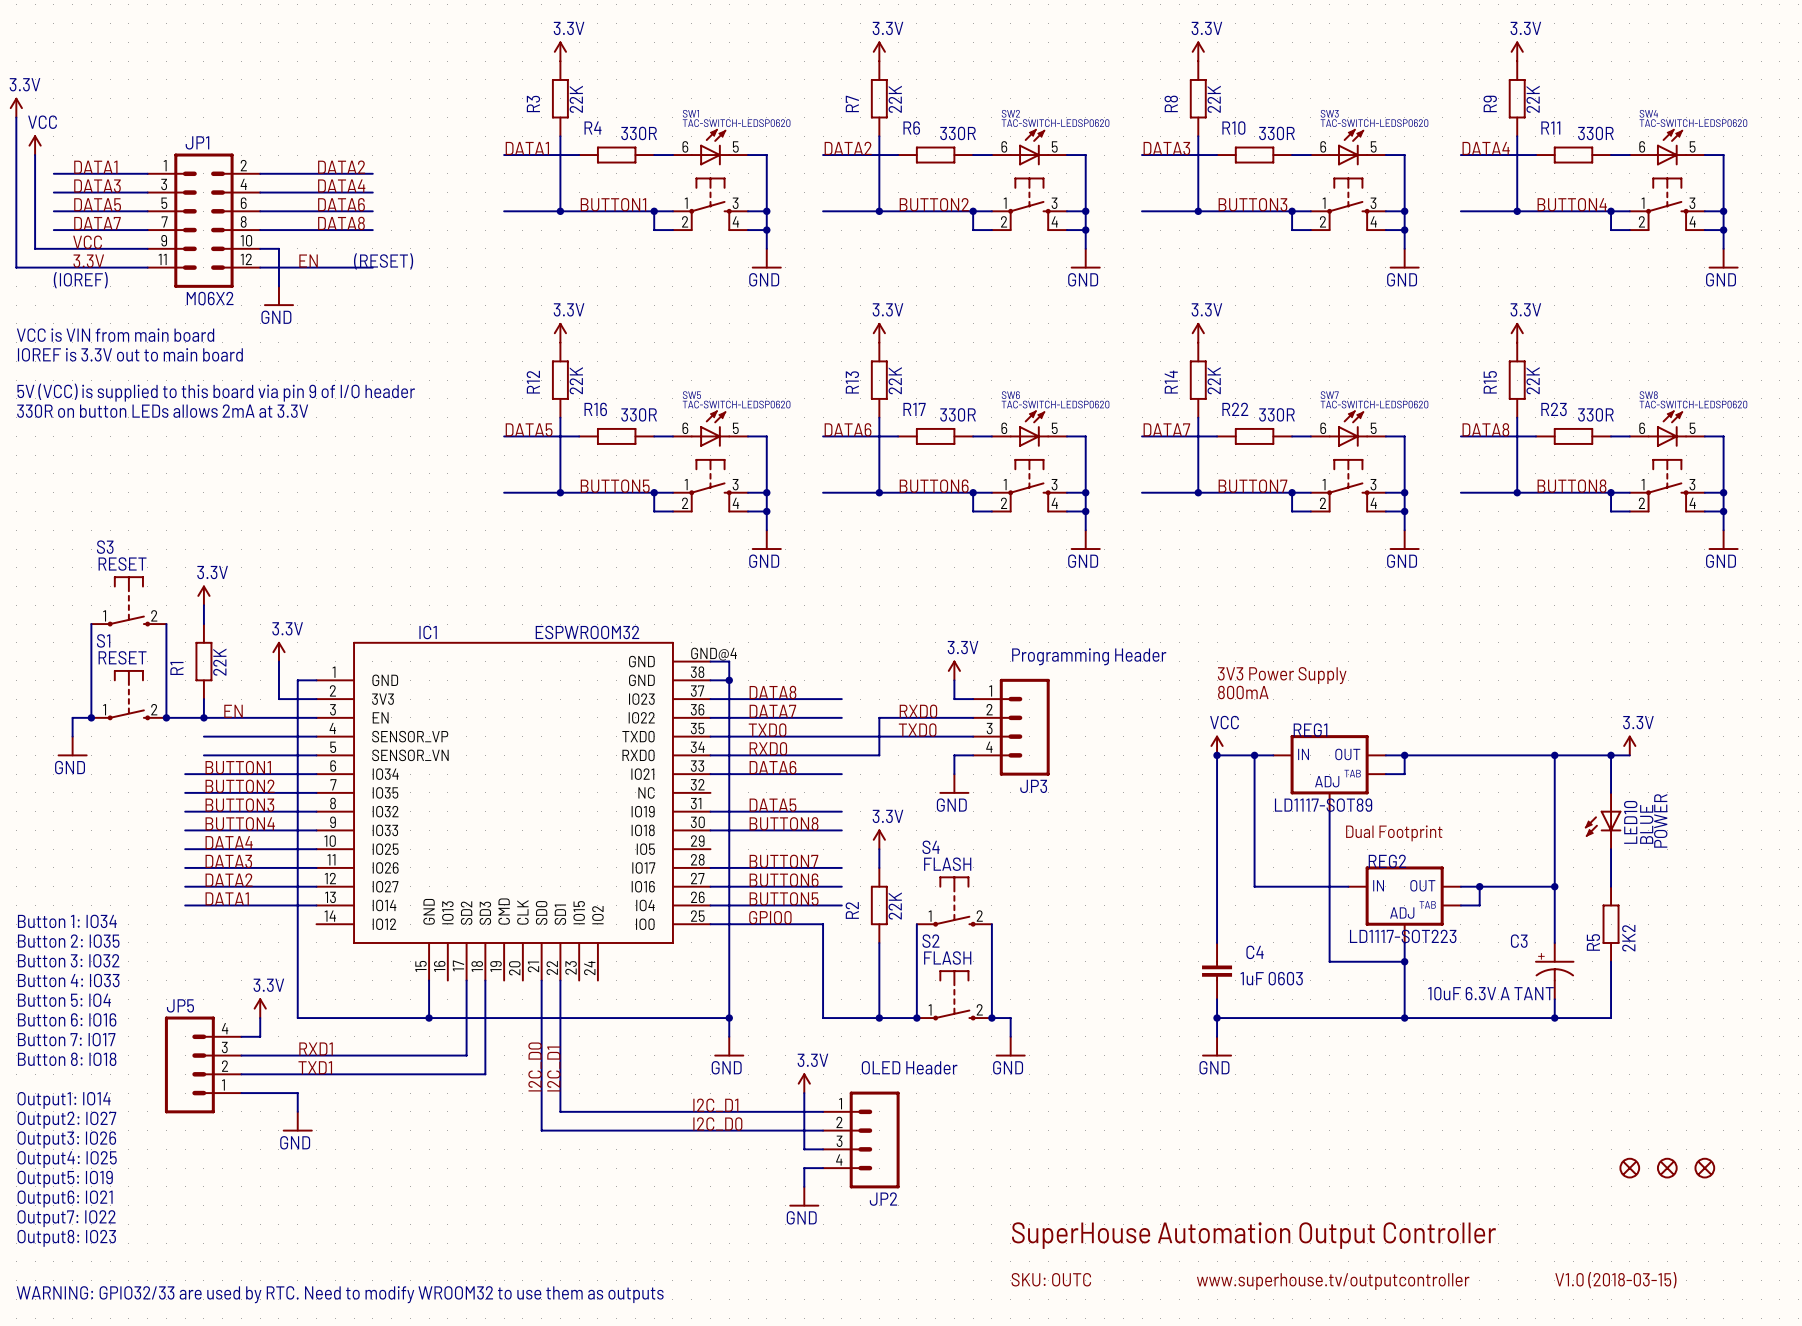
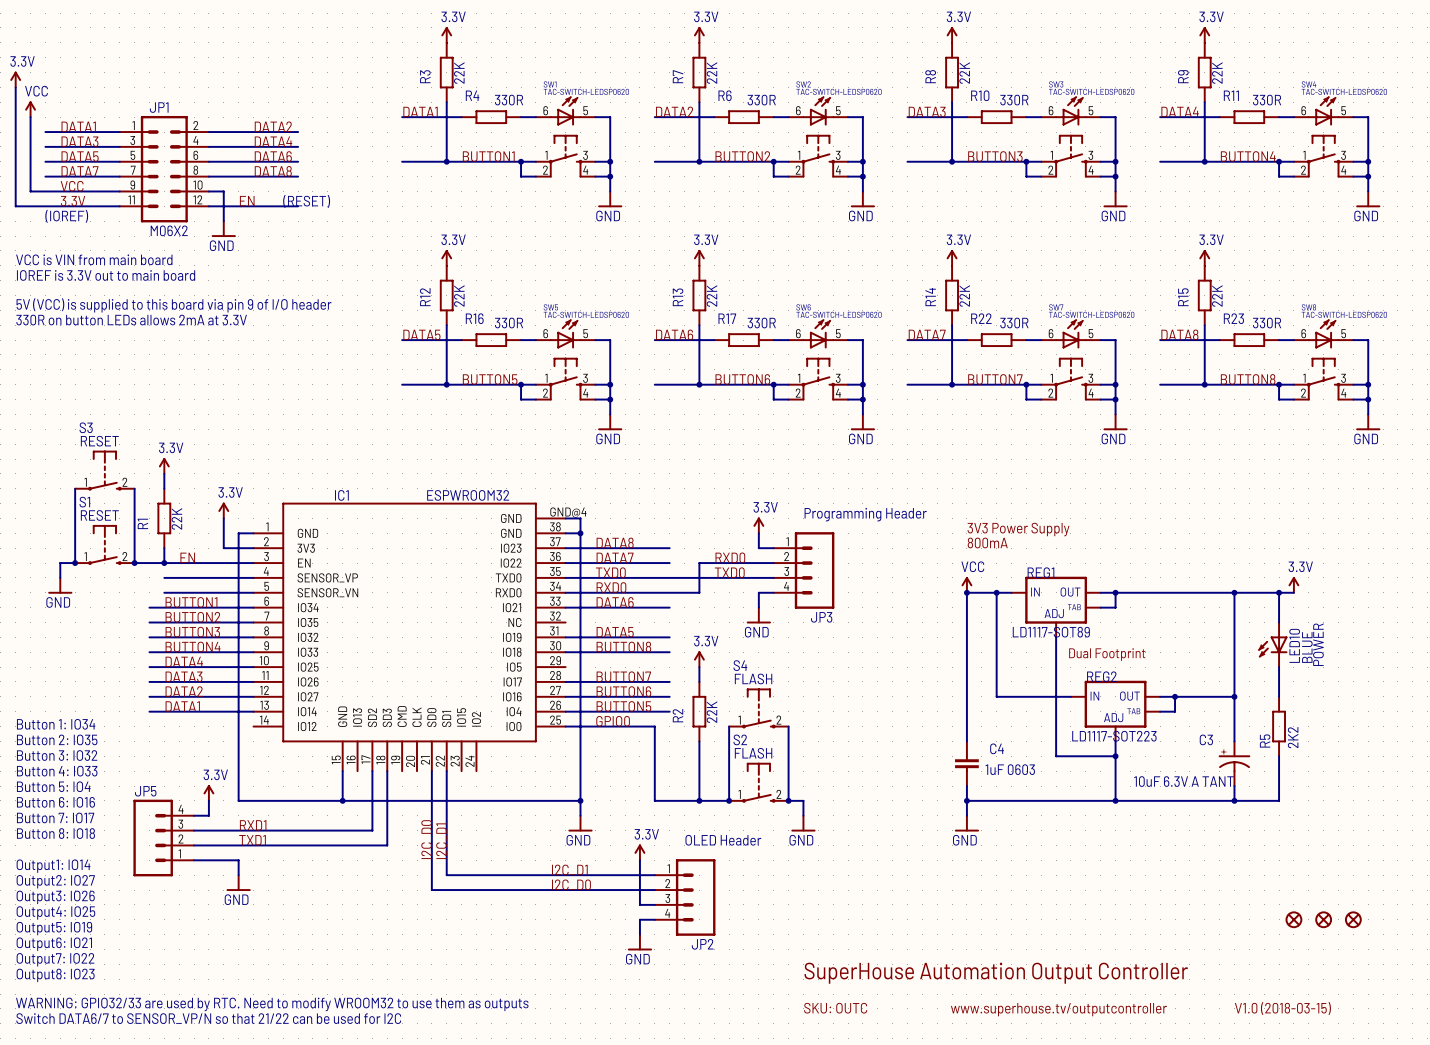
text: none -> WARNING: GPIO32/33 are used by RTC. Need to modify WROOM32 to use them as outputs (272, 1004)
text: WARNING: GPIO32/33 are used by RTC. Need to modify WROOM32 to use them as outputs (340, 1294) -> Switch DATA6/7 to SENSOR_VP/N so that 21/22 can be used for I2C (208, 1018)

